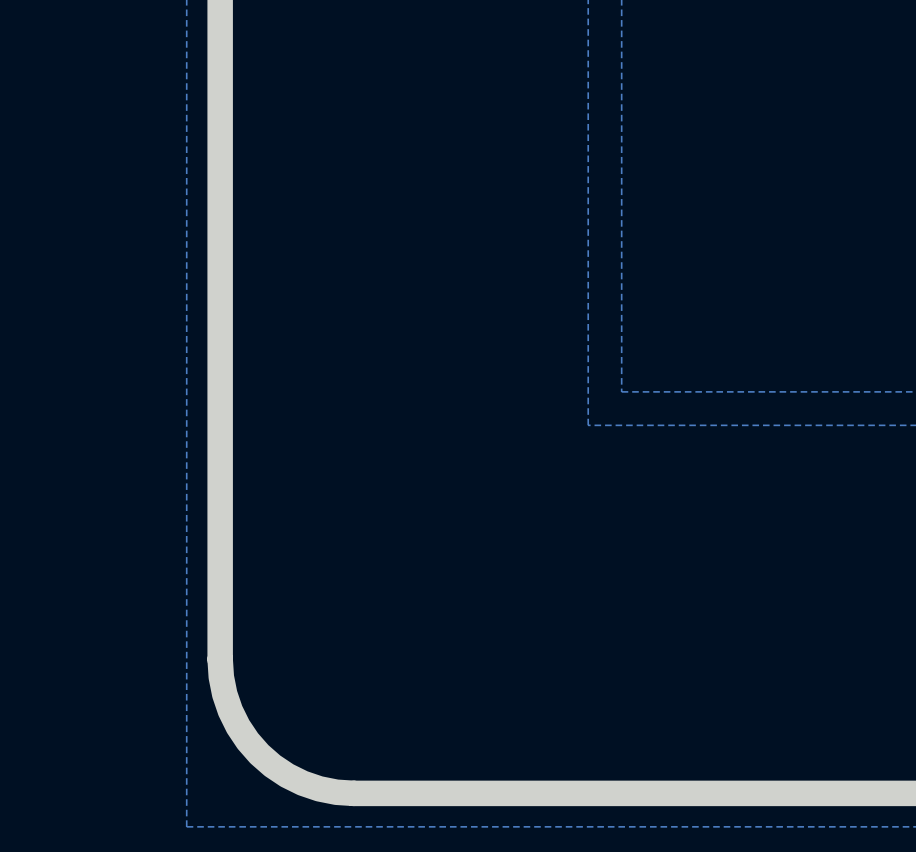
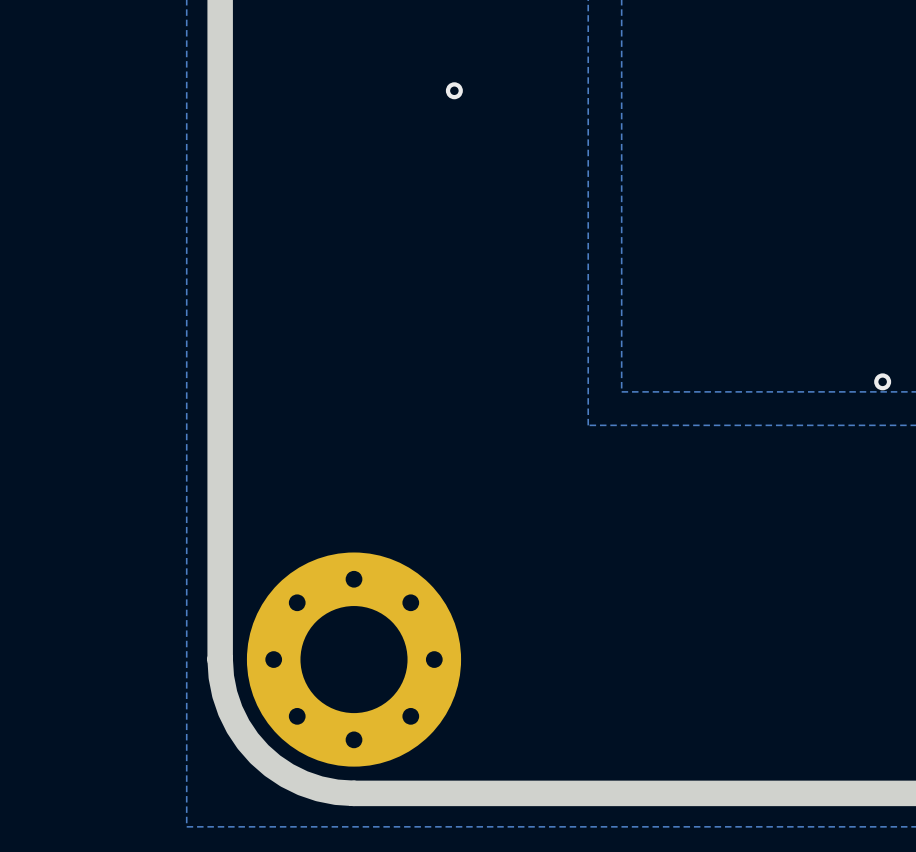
via: none -> (454, 90)
via: none -> (882, 381)
part: none -> (354, 659)

